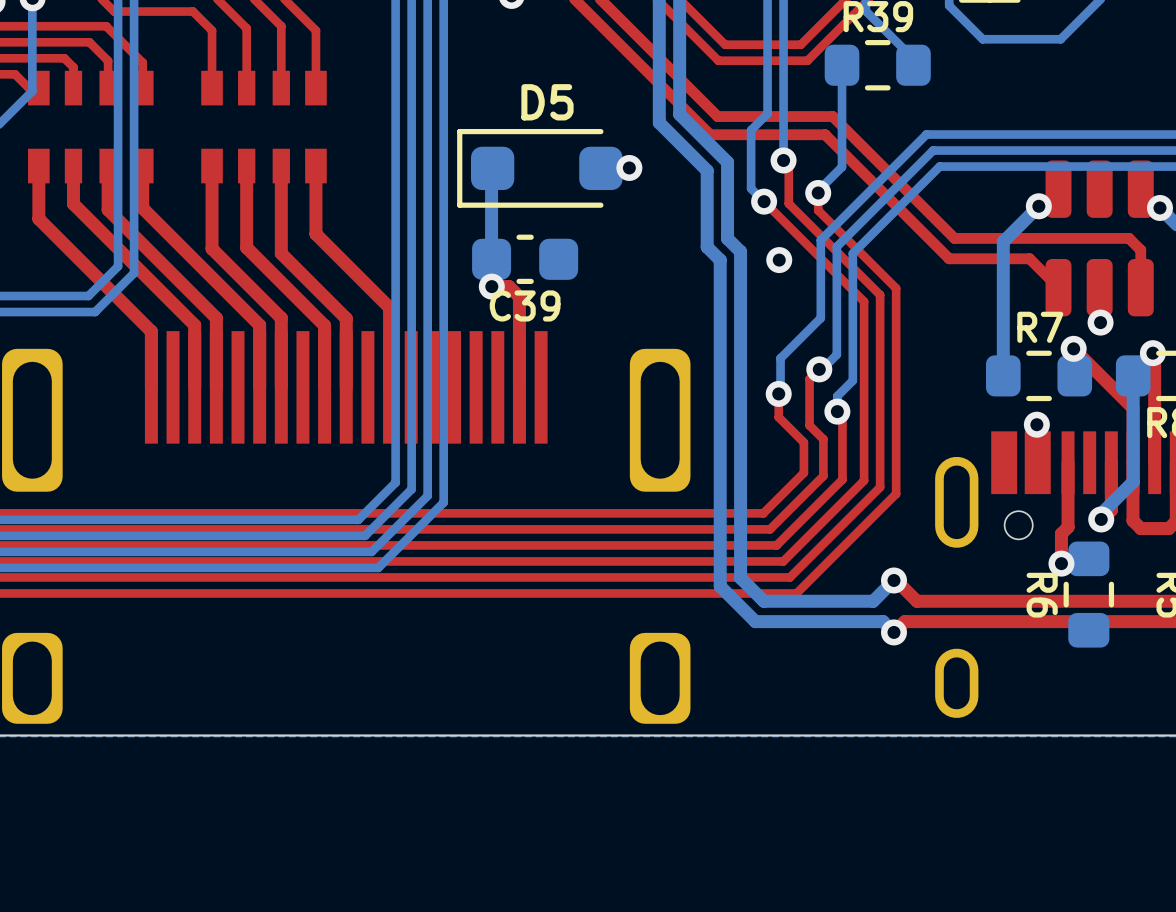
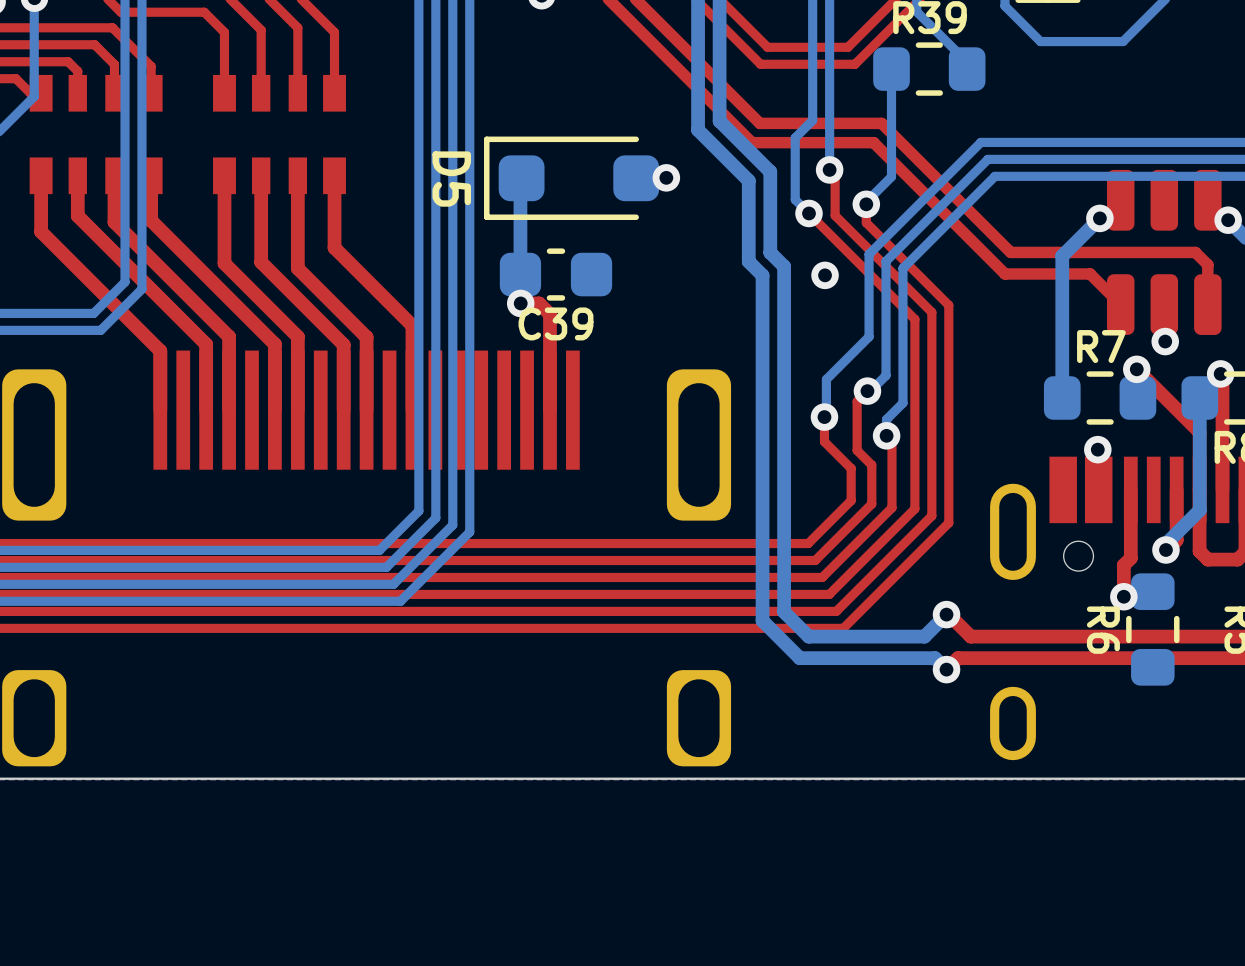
D5 name rotation: 0° (547, 102) -> 90° clockwise (451, 179)
D5 name position: D5 (547, 102) -> D5 (451, 179)

